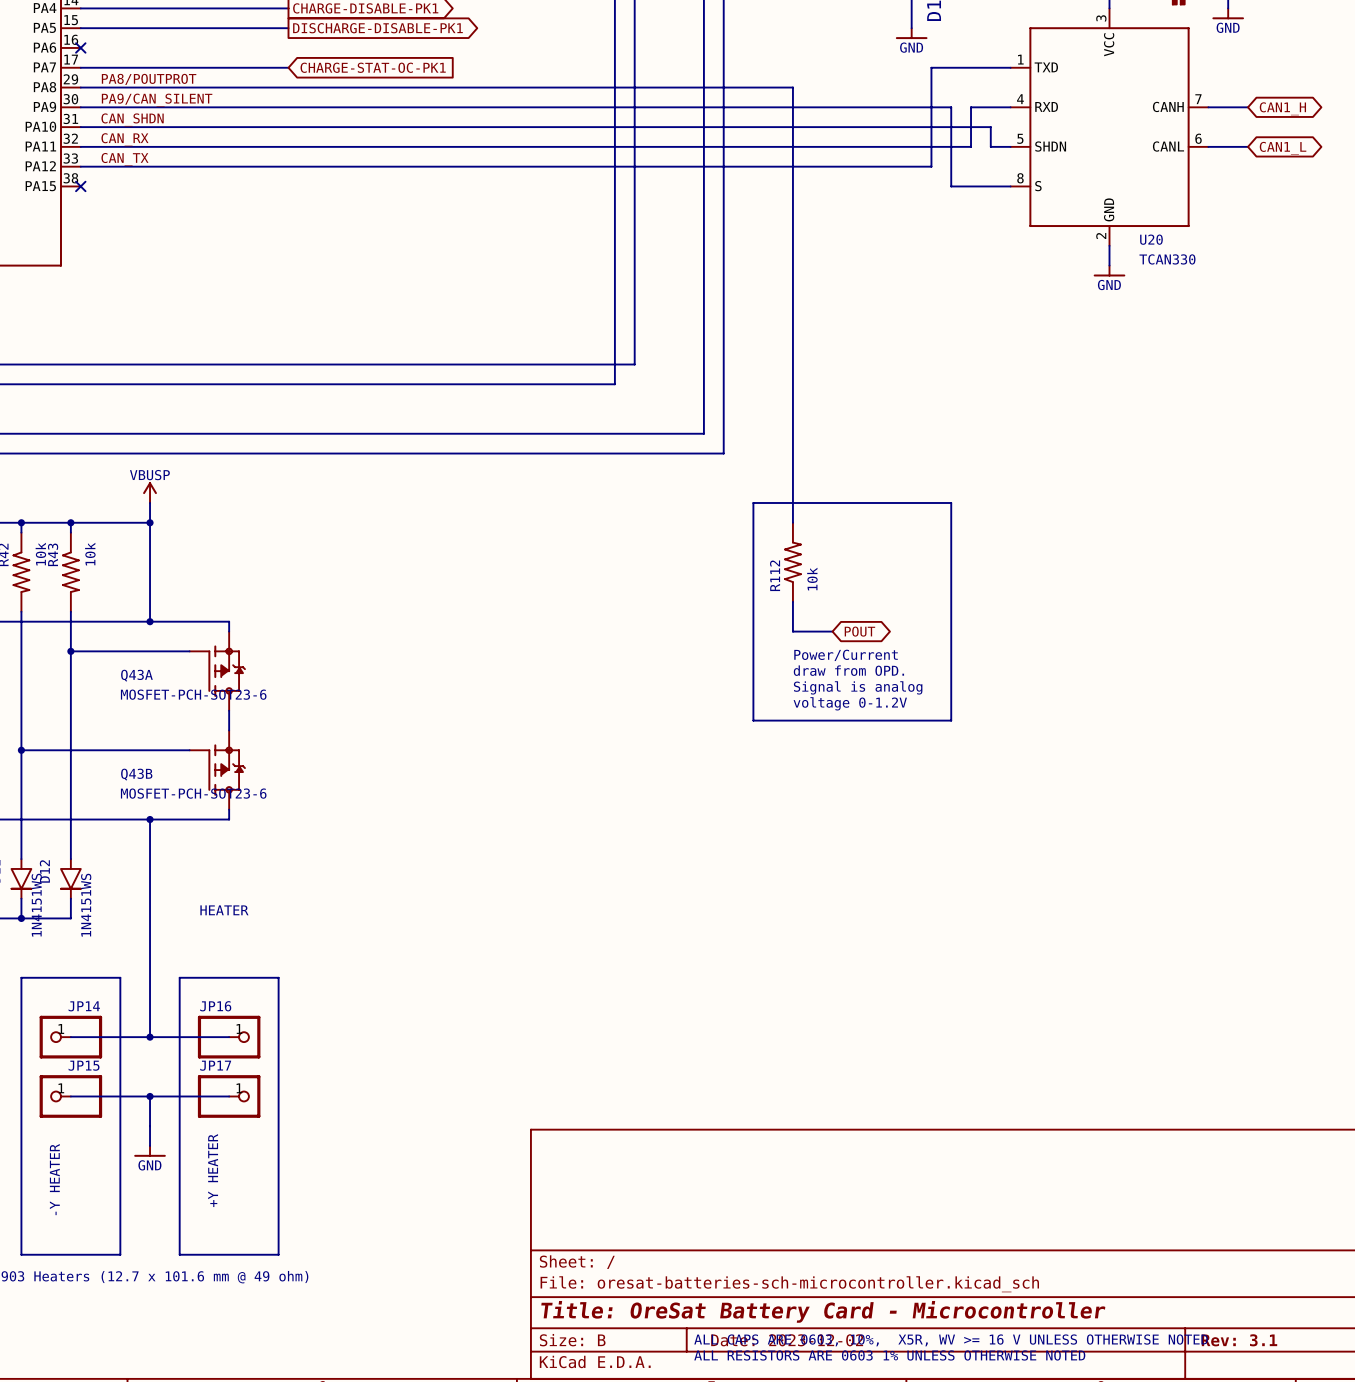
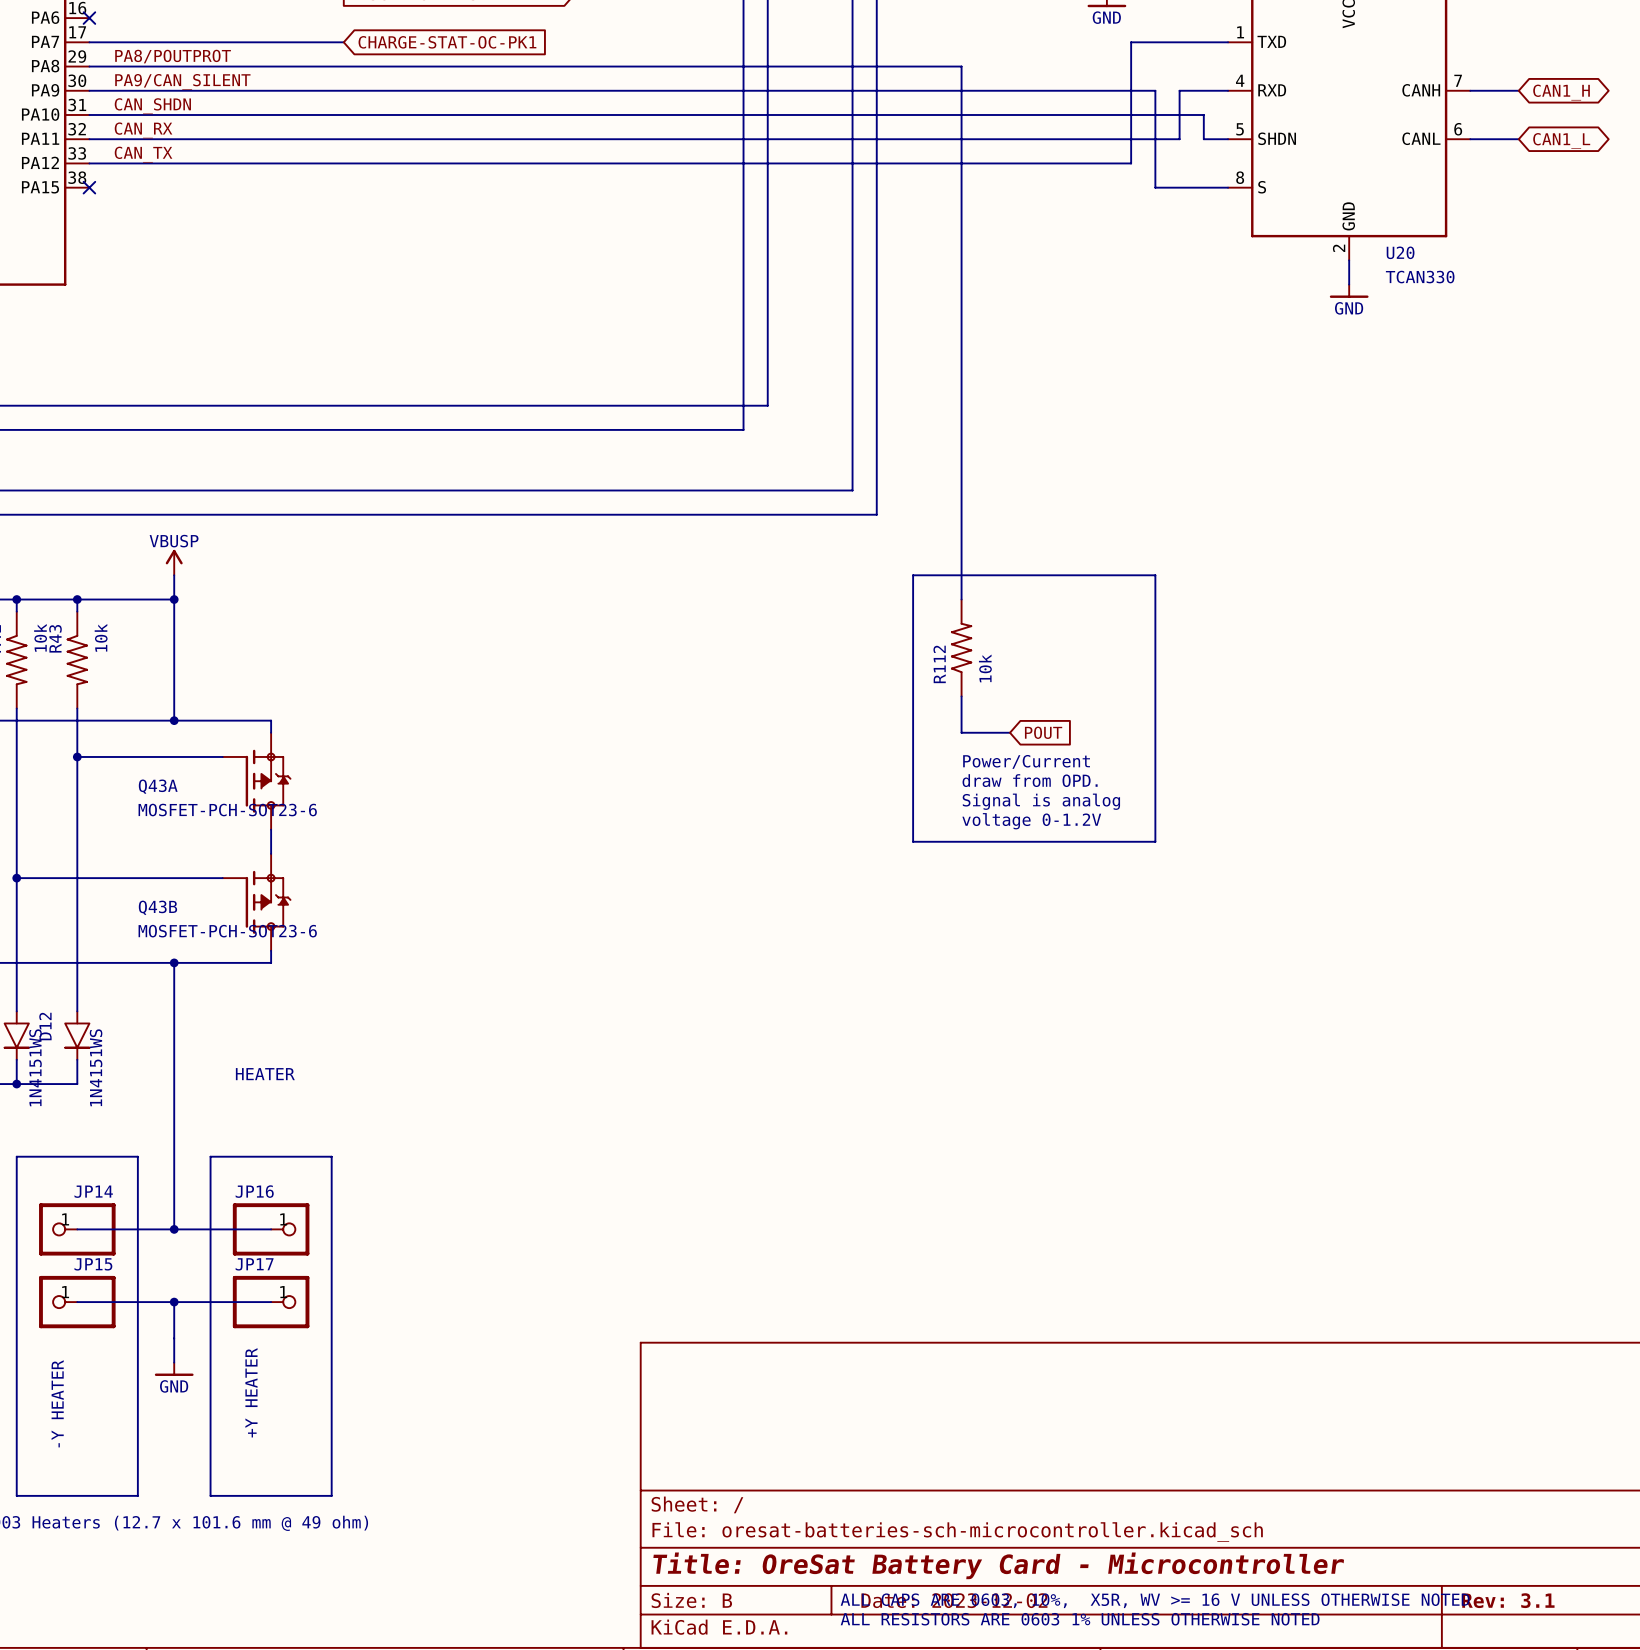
global label shape: bidirectional (859, 631) -> input (1043, 732)

